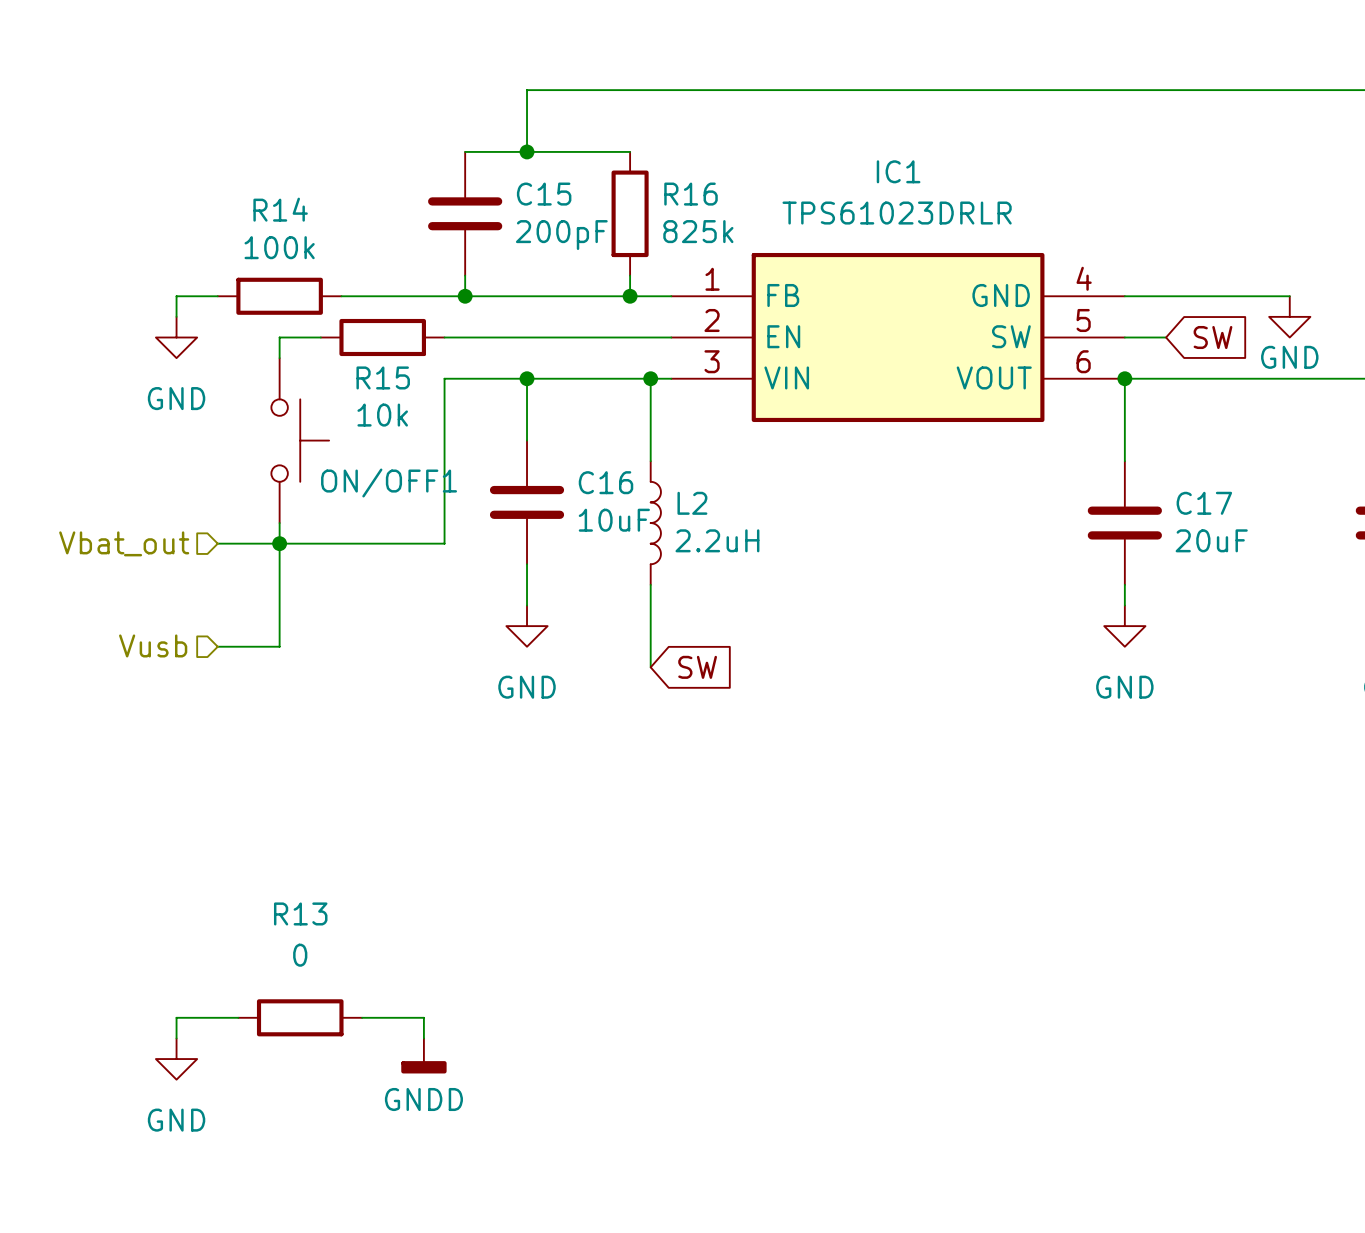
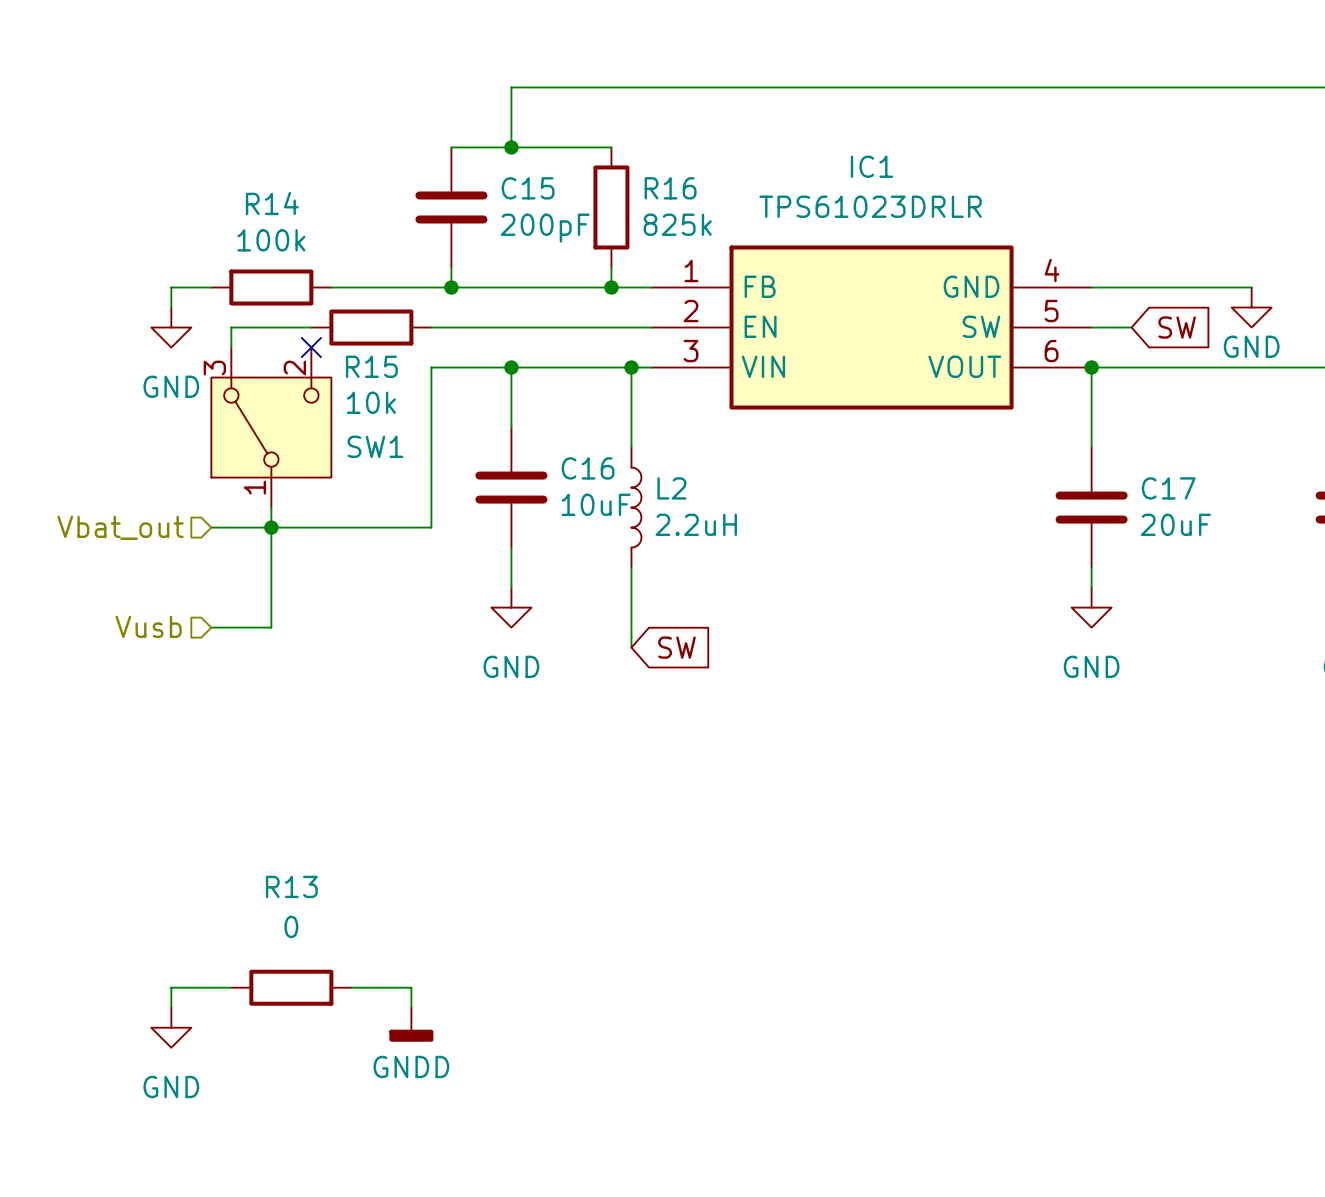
wire: (279, 337) (279, 358) -> (271, 327) (231, 327) (231, 347)
no-connect mark: none -> (311, 347)
SW1: none -> (271, 427)
ON/OFF1: (300, 440) -> none

